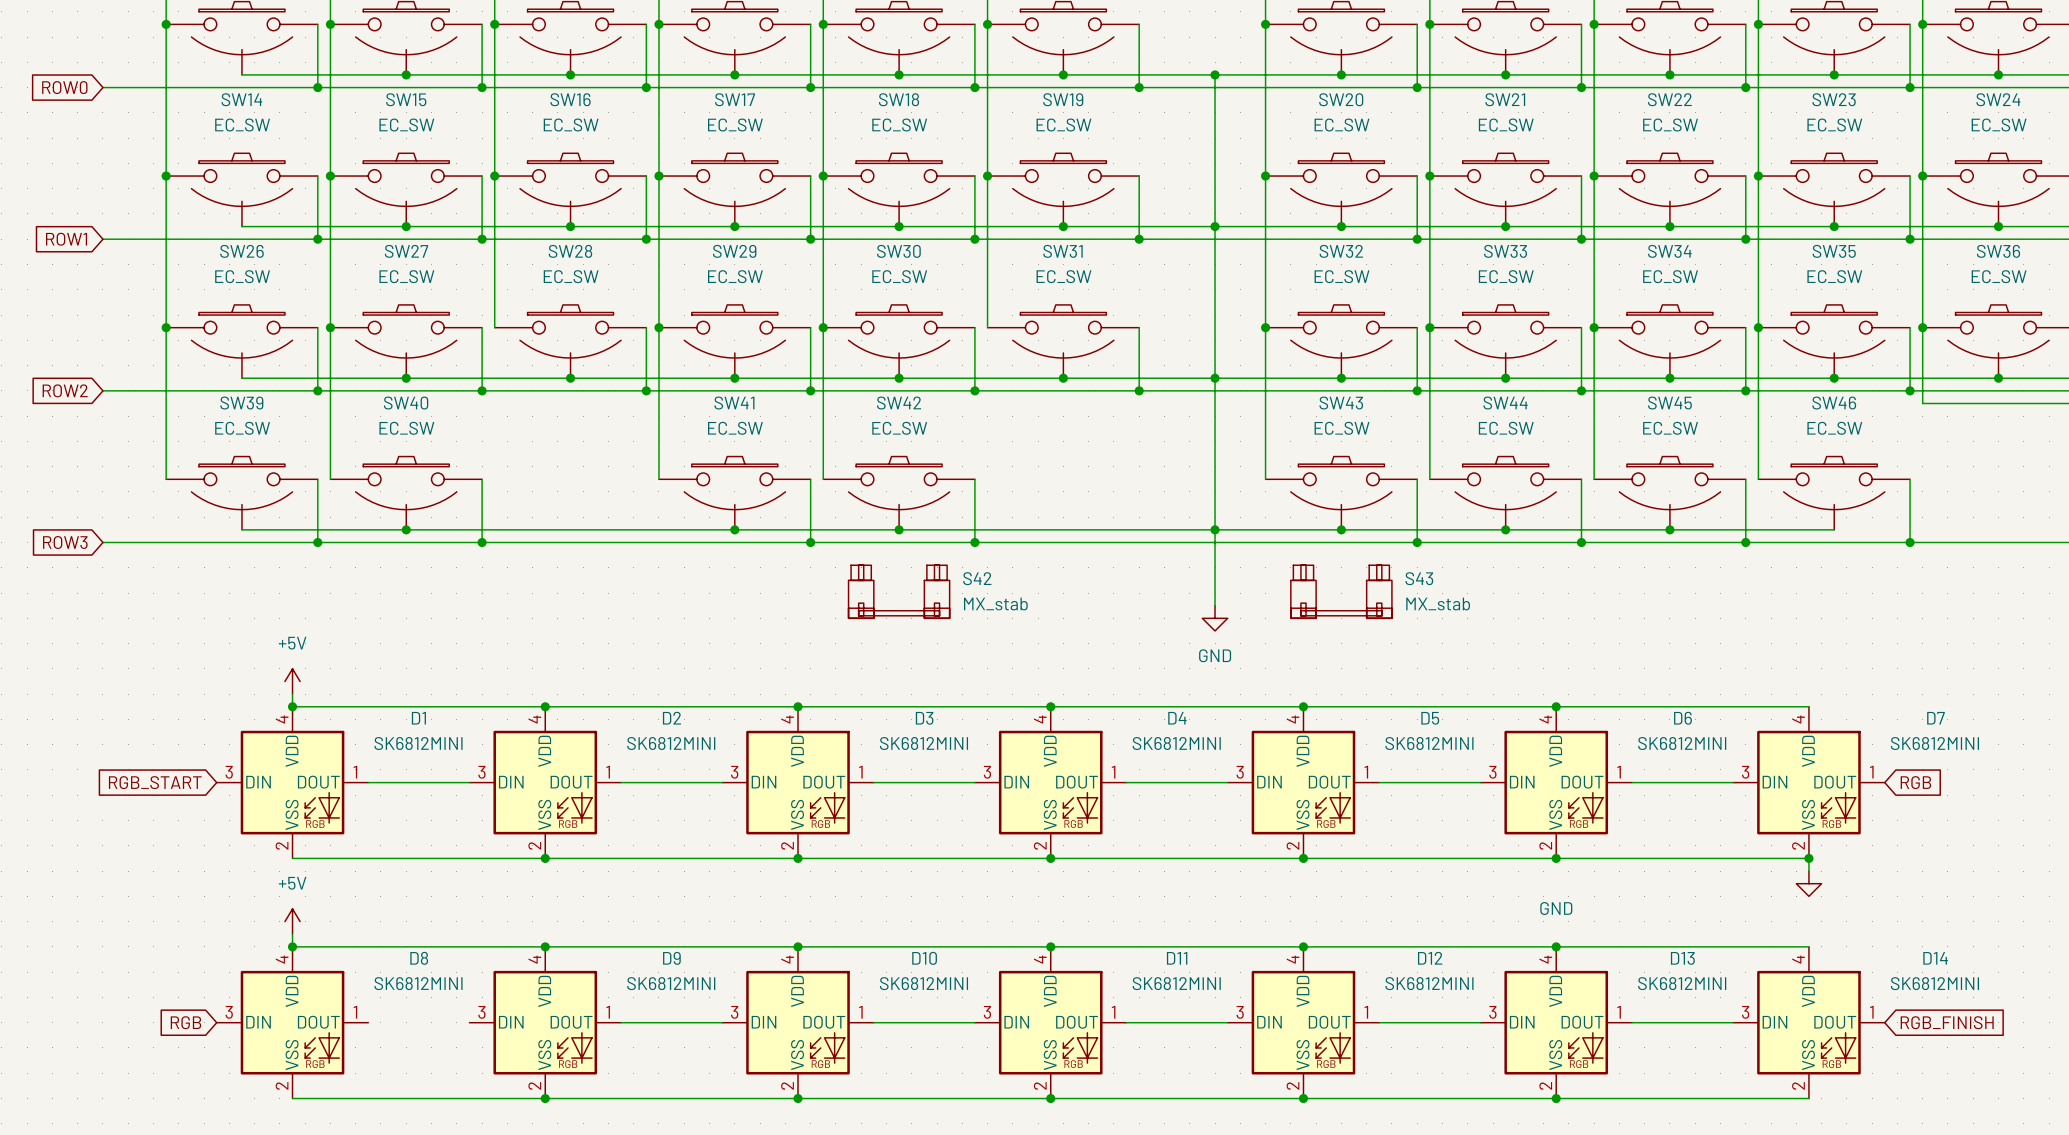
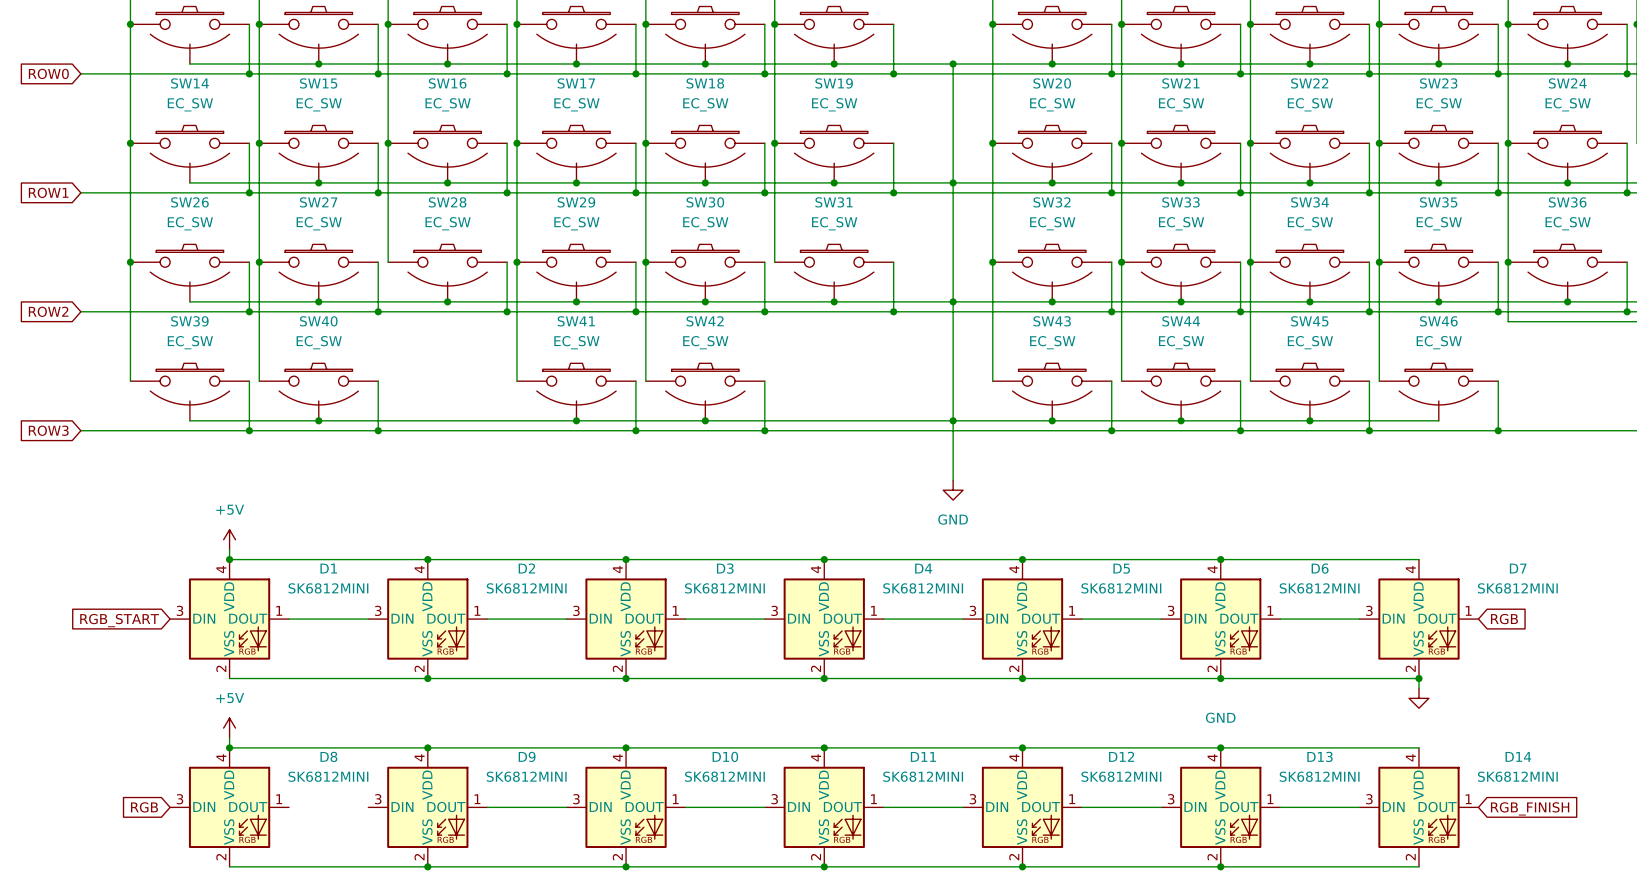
S42: MX_stab (899, 591) -> none
S43: MX_stab (1341, 591) -> none

